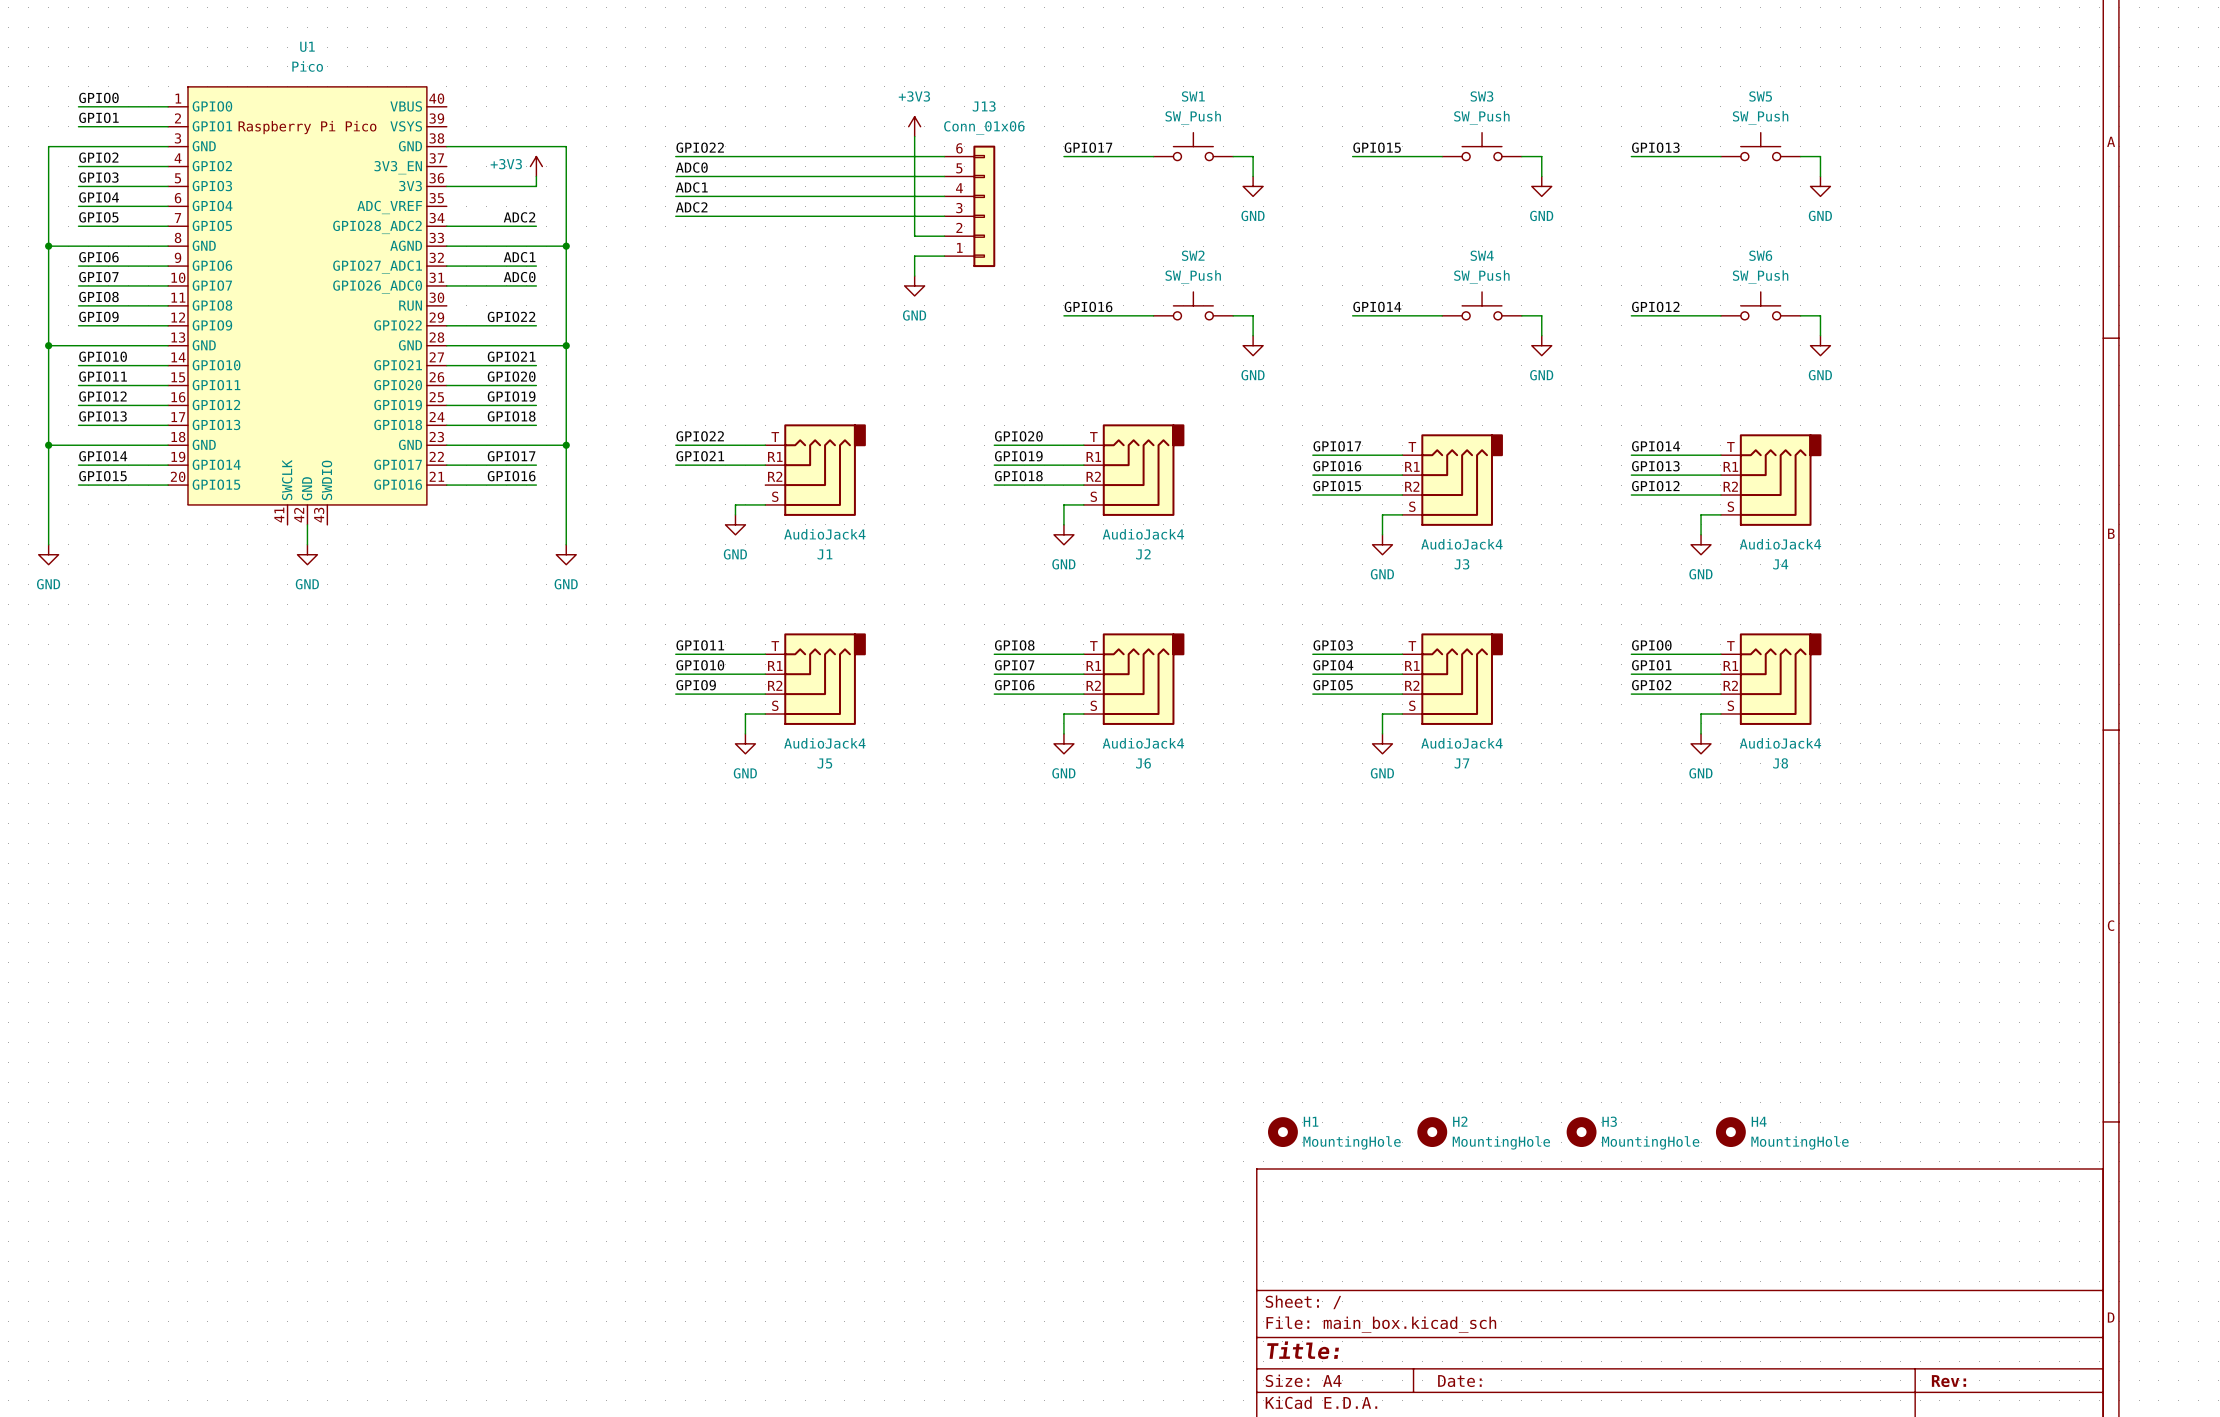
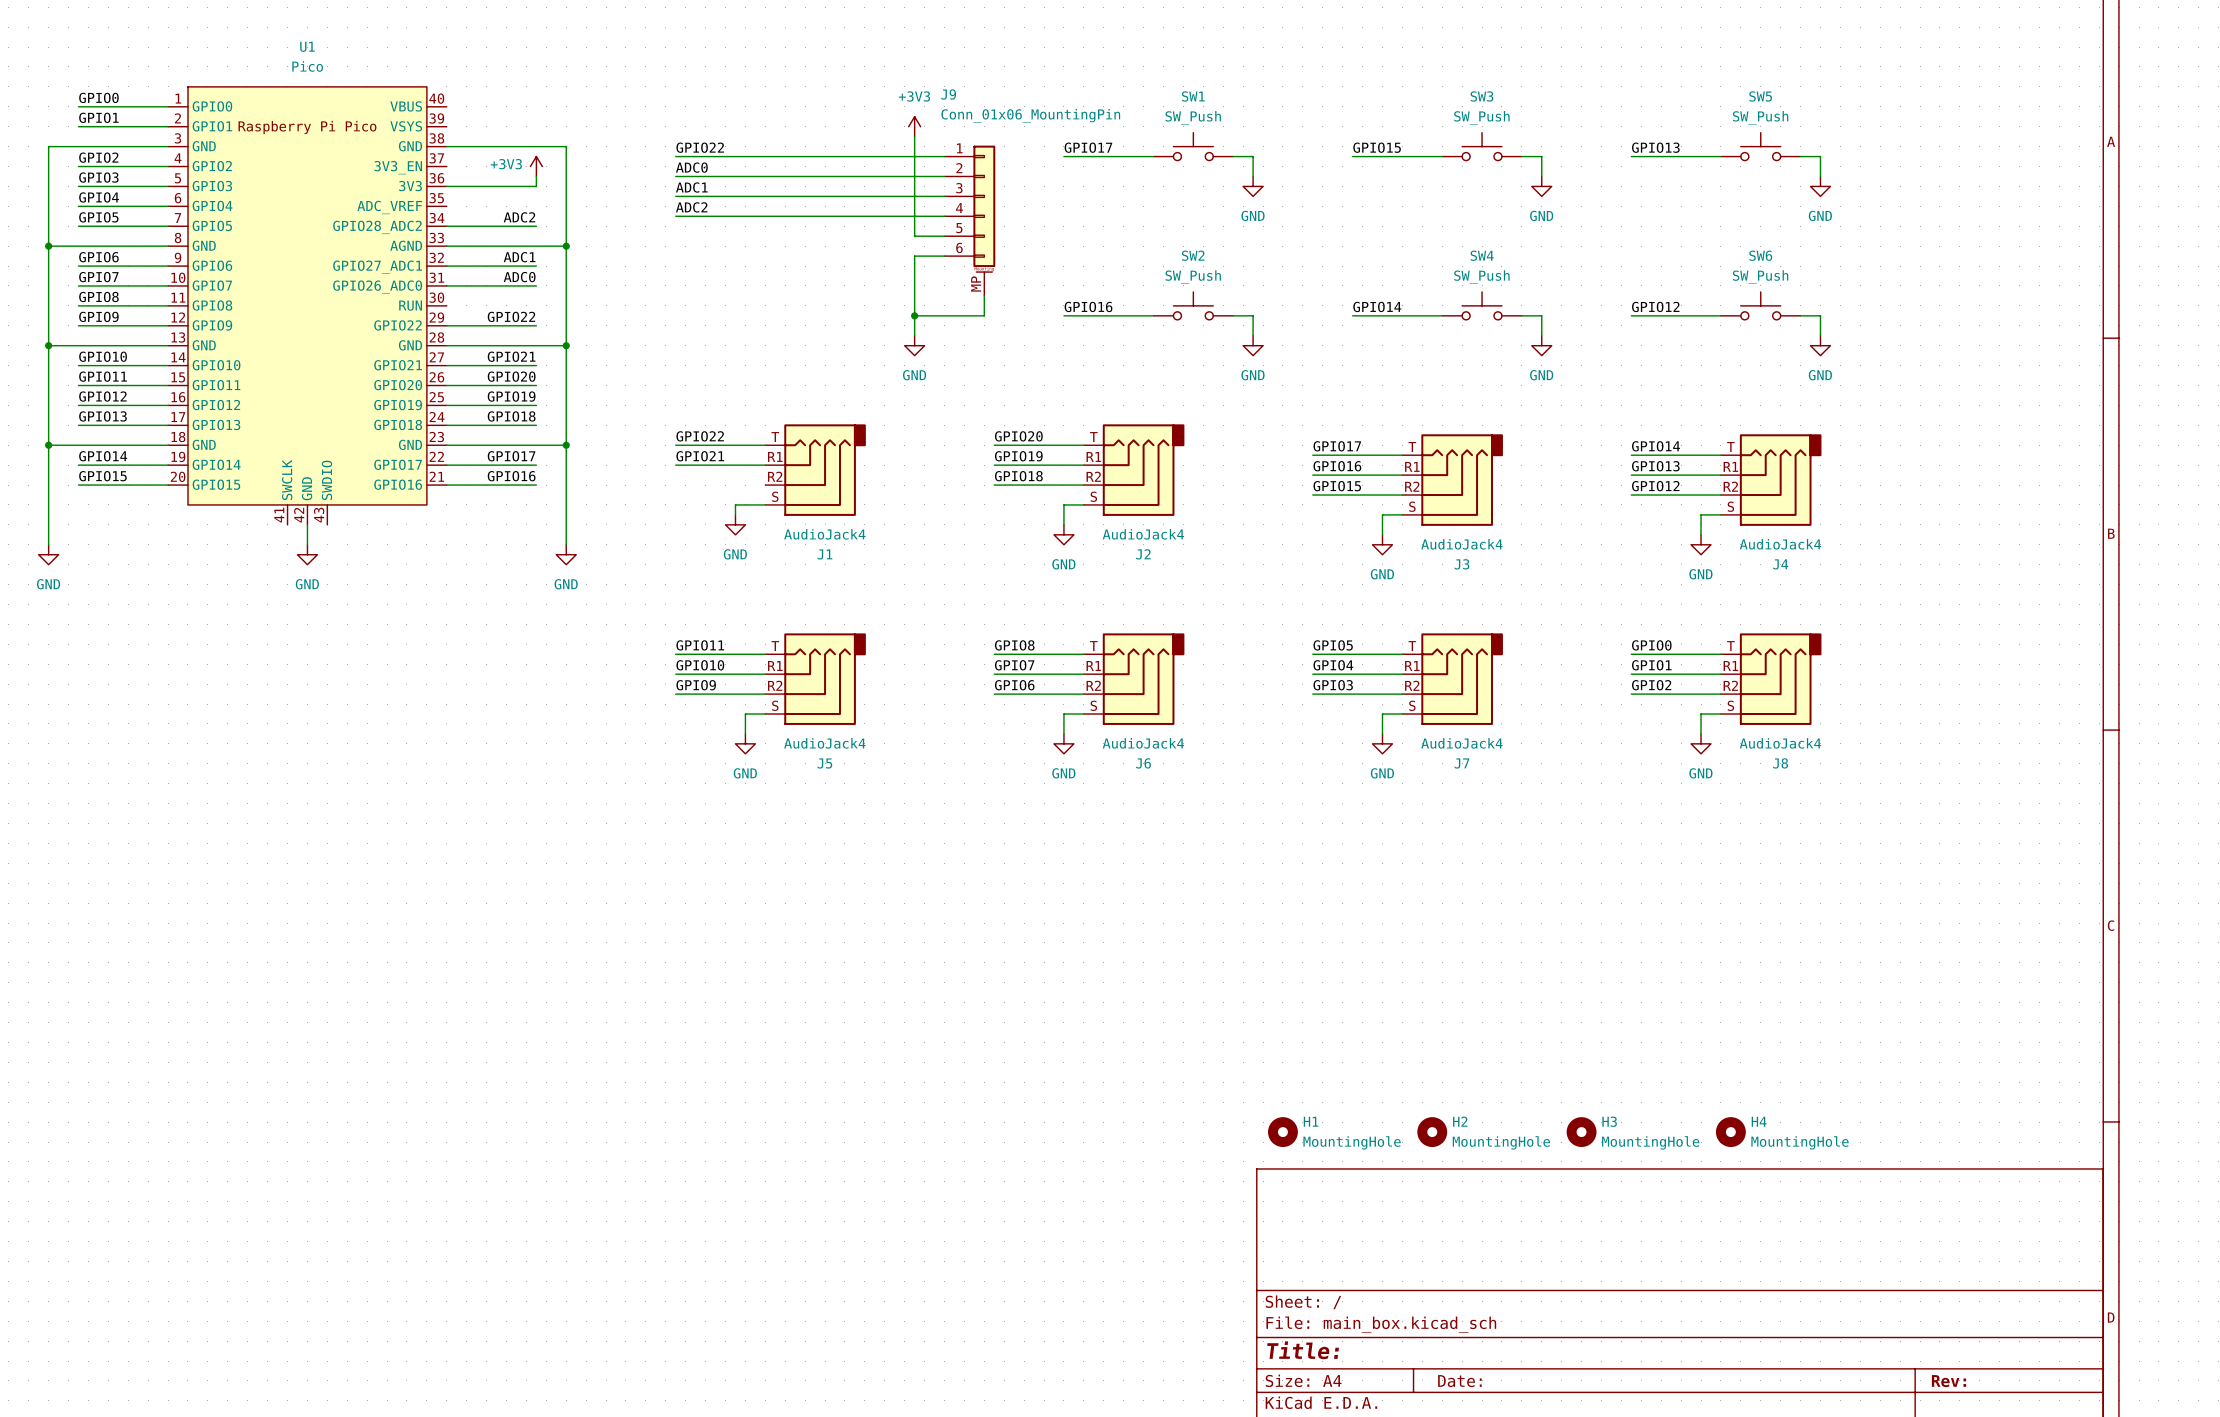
J13: Conn_01x06 (969, 206) -> none
J9: none -> Conn_01x06_MountingPin (969, 220)
wire: none -> (914, 276) (914, 335)
power symbol position: GND (914, 285) -> GND (914, 345)
wire: none -> (984, 295) (984, 315) (914, 315)
junction: none -> (914, 315)
label: GPIO3 (1333, 645) -> GPIO5 (1333, 645)
label: GPIO5 (1333, 685) -> GPIO3 (1333, 685)

